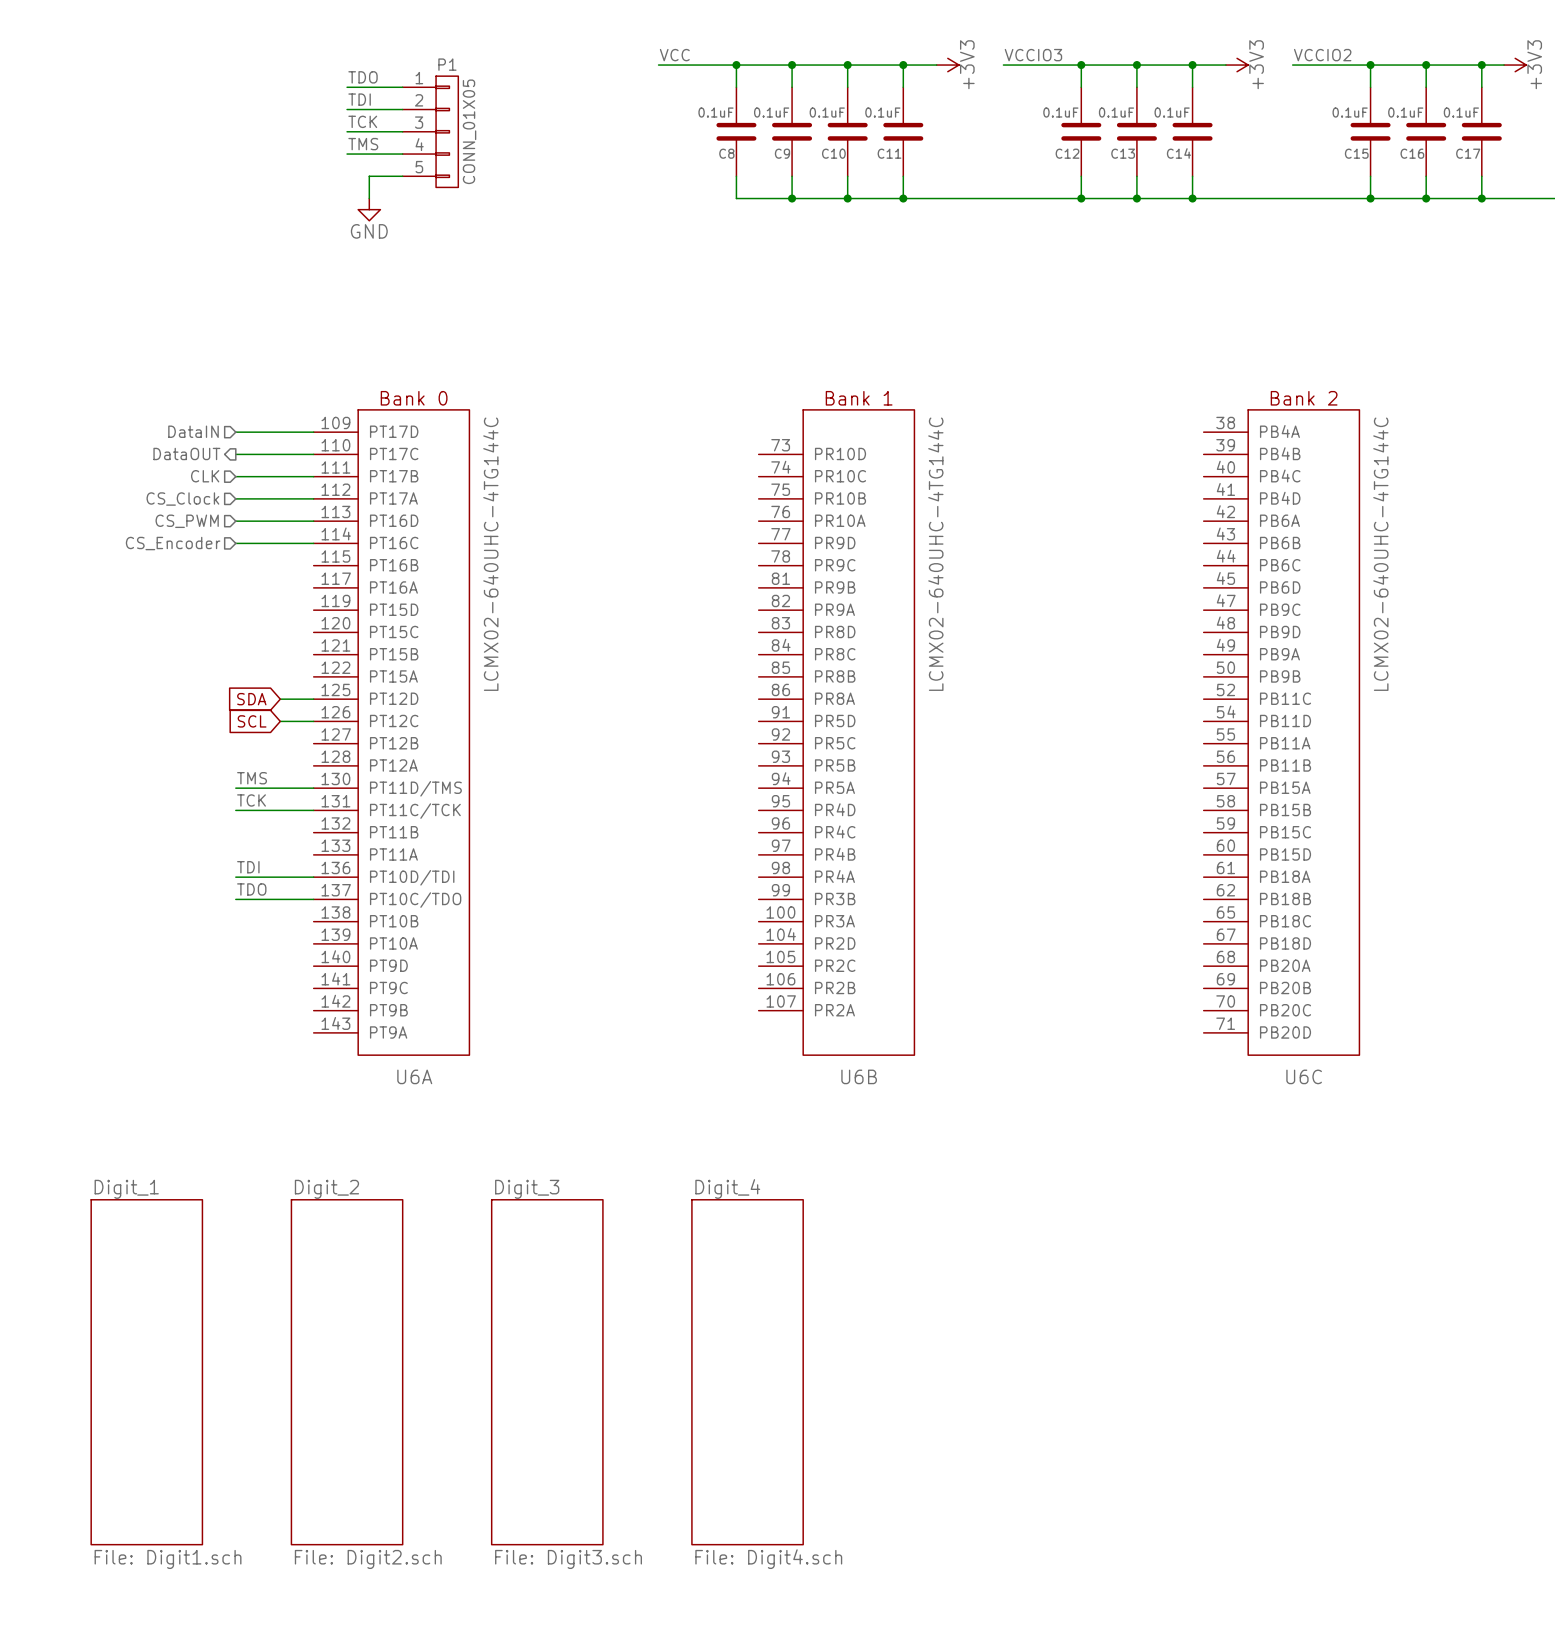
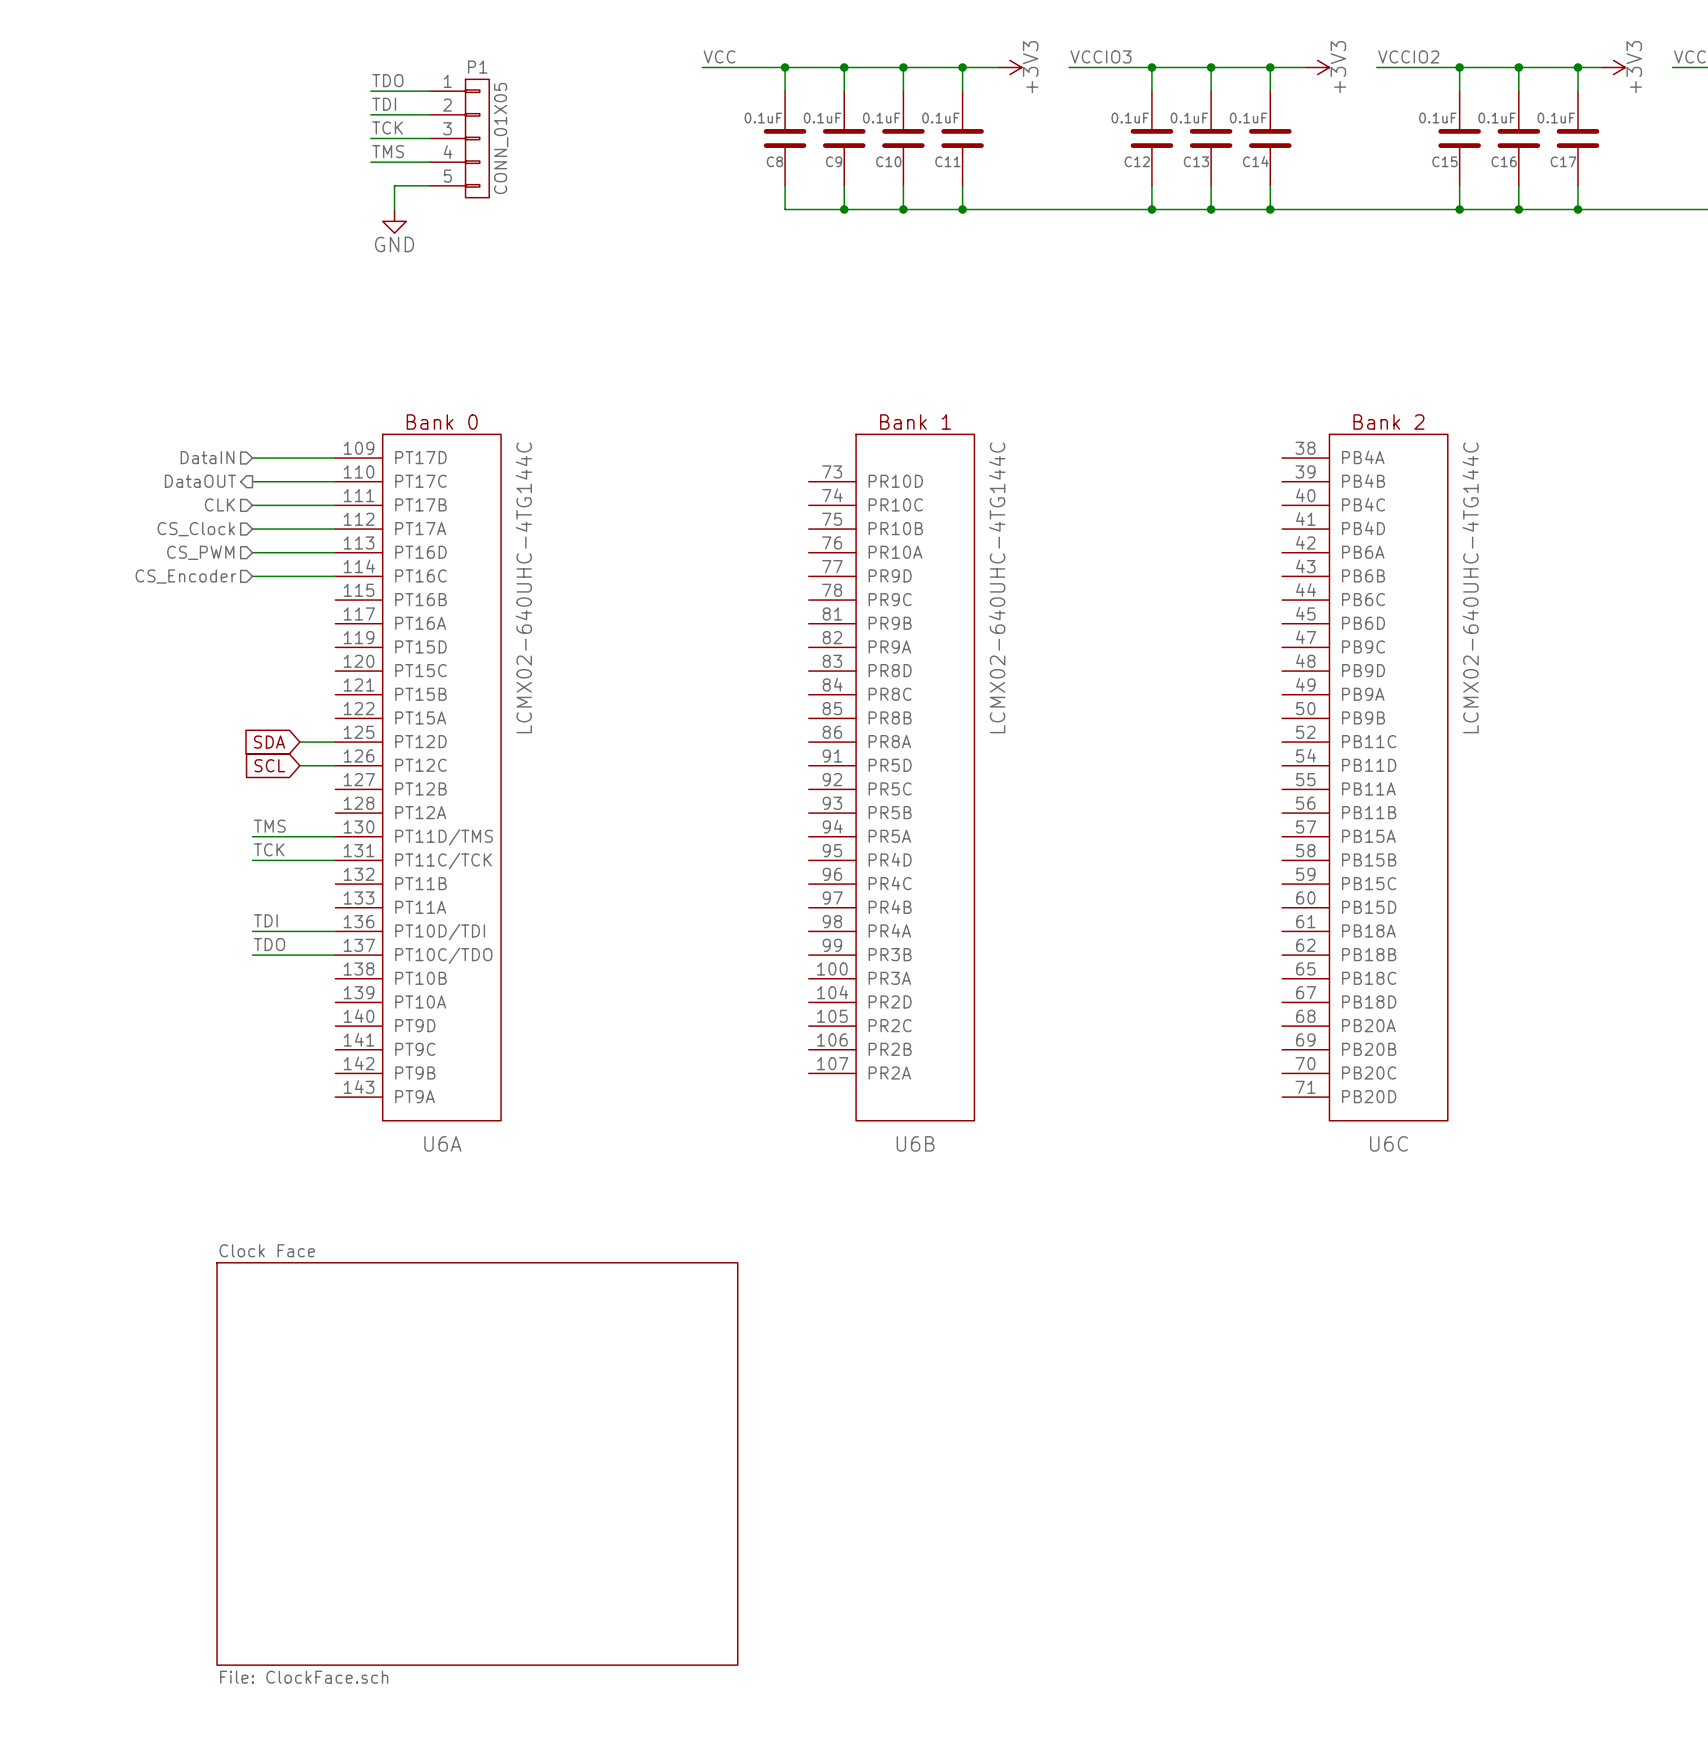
sheet Digit_1: File: Digit1.sch (146, 1372) -> none
sheet Digit_2: File: Digit2.sch (347, 1372) -> none
sheet Digit_3: File: Digit3.sch (547, 1372) -> none
sheet Digit_4: File: Digit4.sch (747, 1372) -> none
sheet Clock Face: none -> File: ClockFace.sch (477, 1463)

